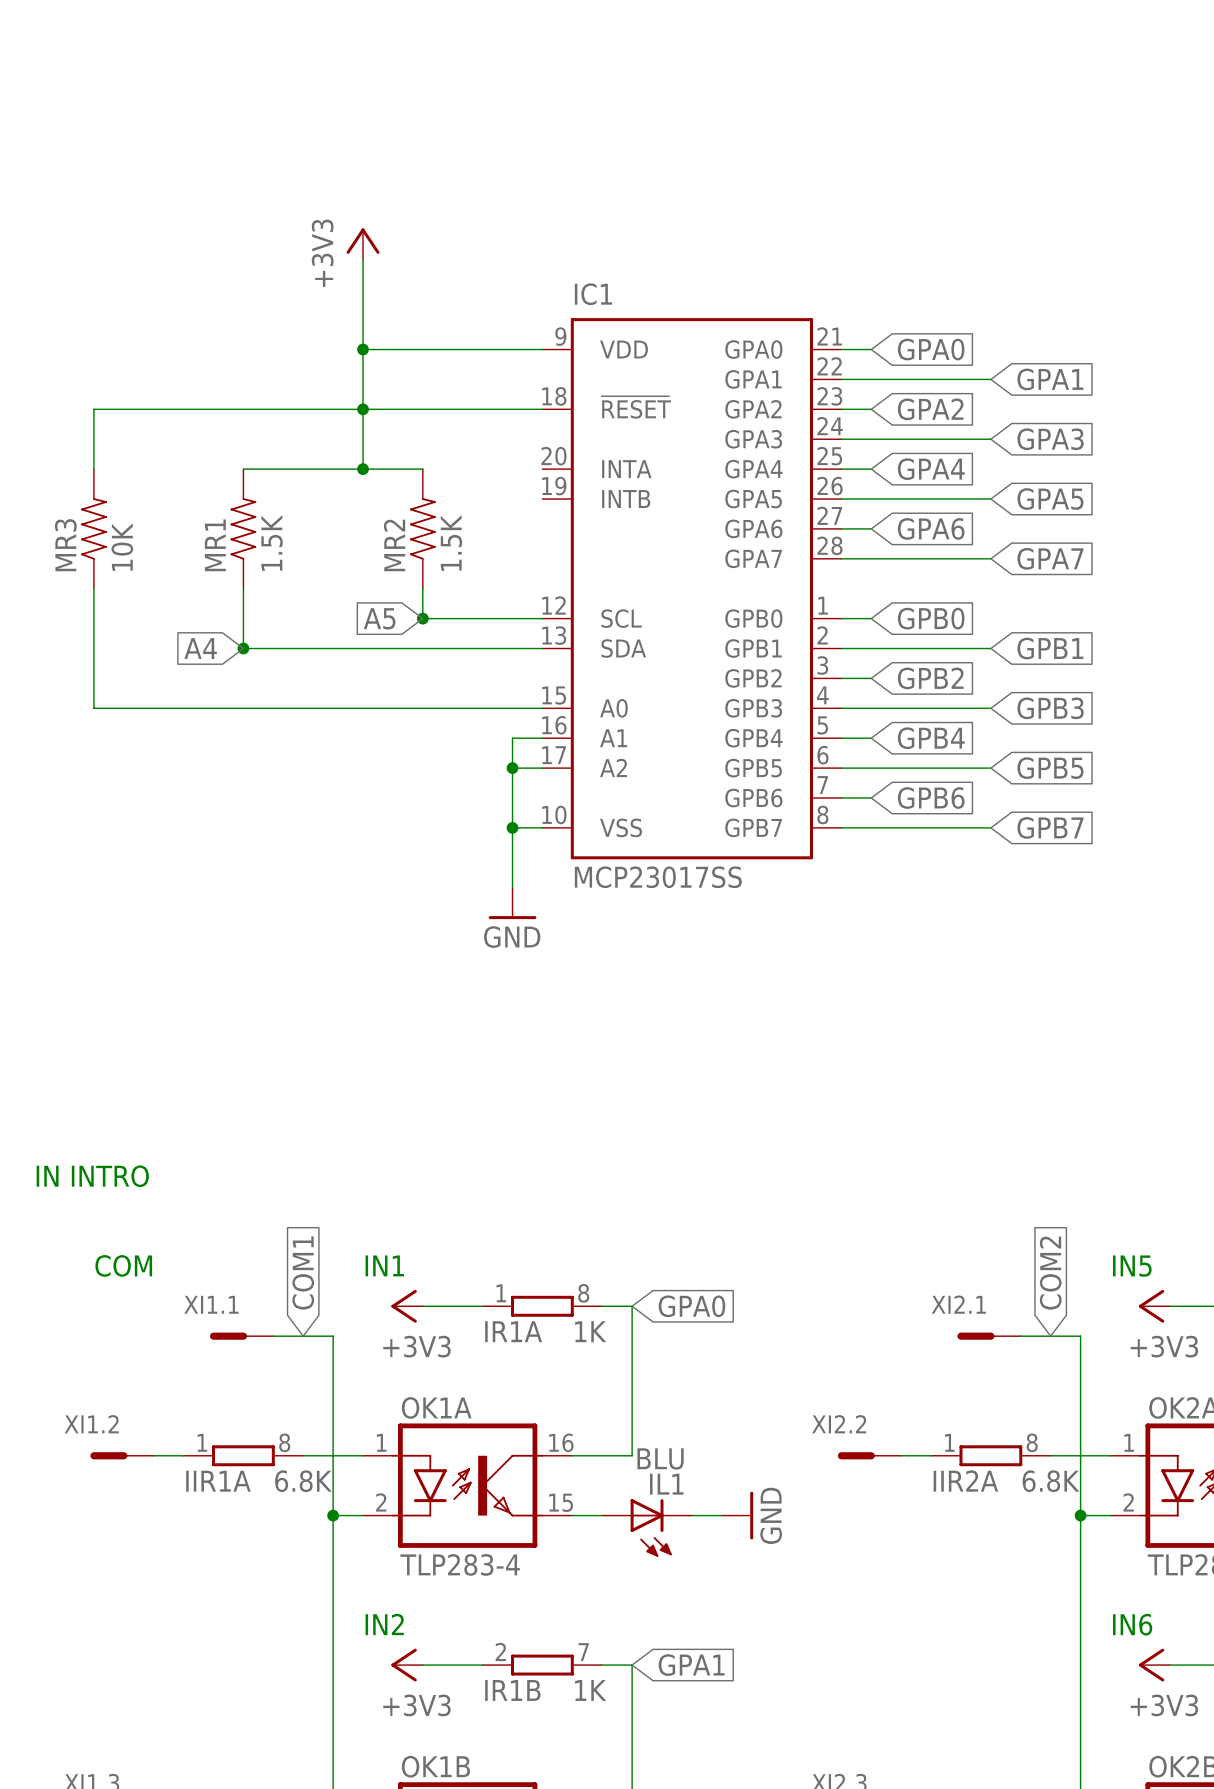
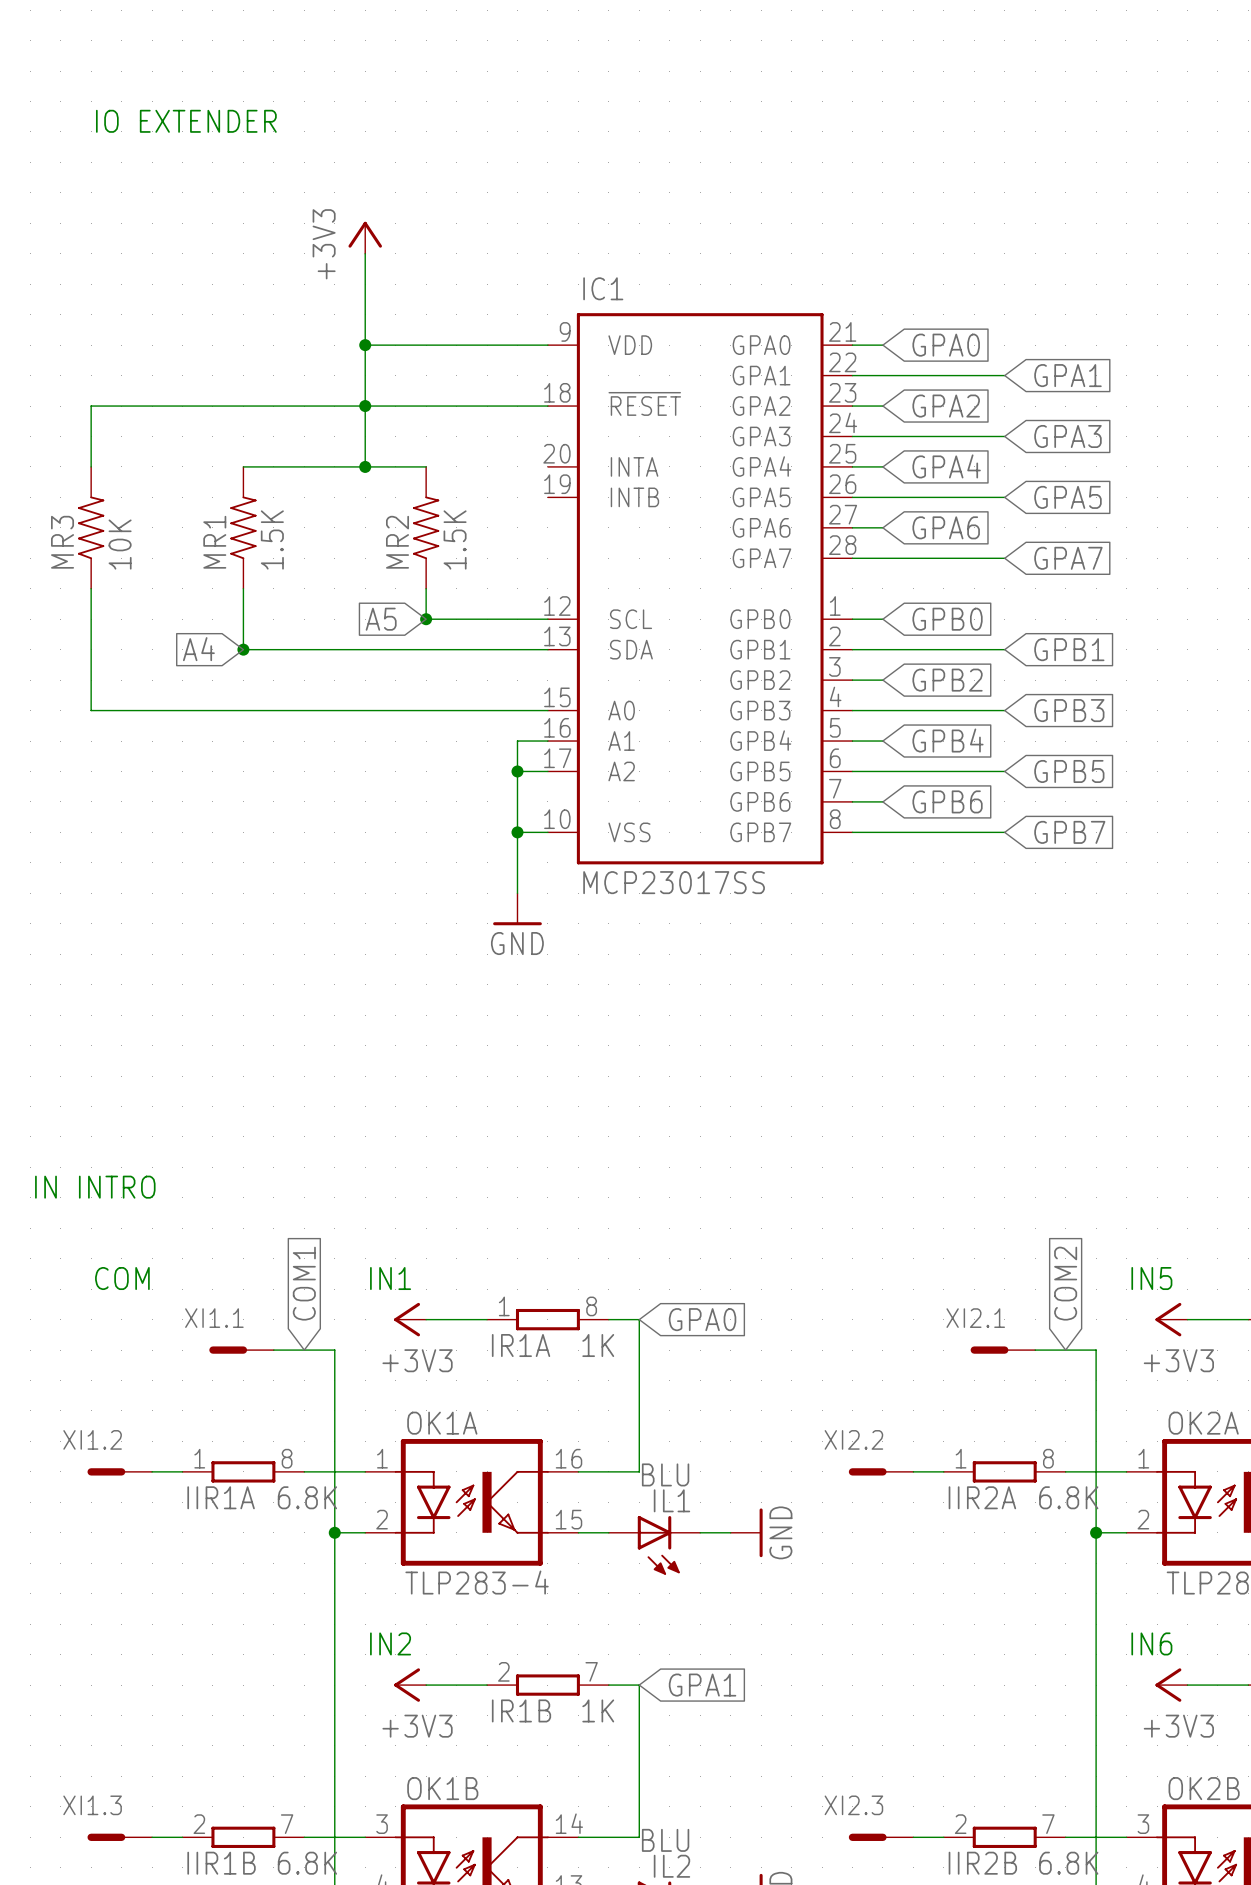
text: none -> IO EXTENDER (186, 121)

